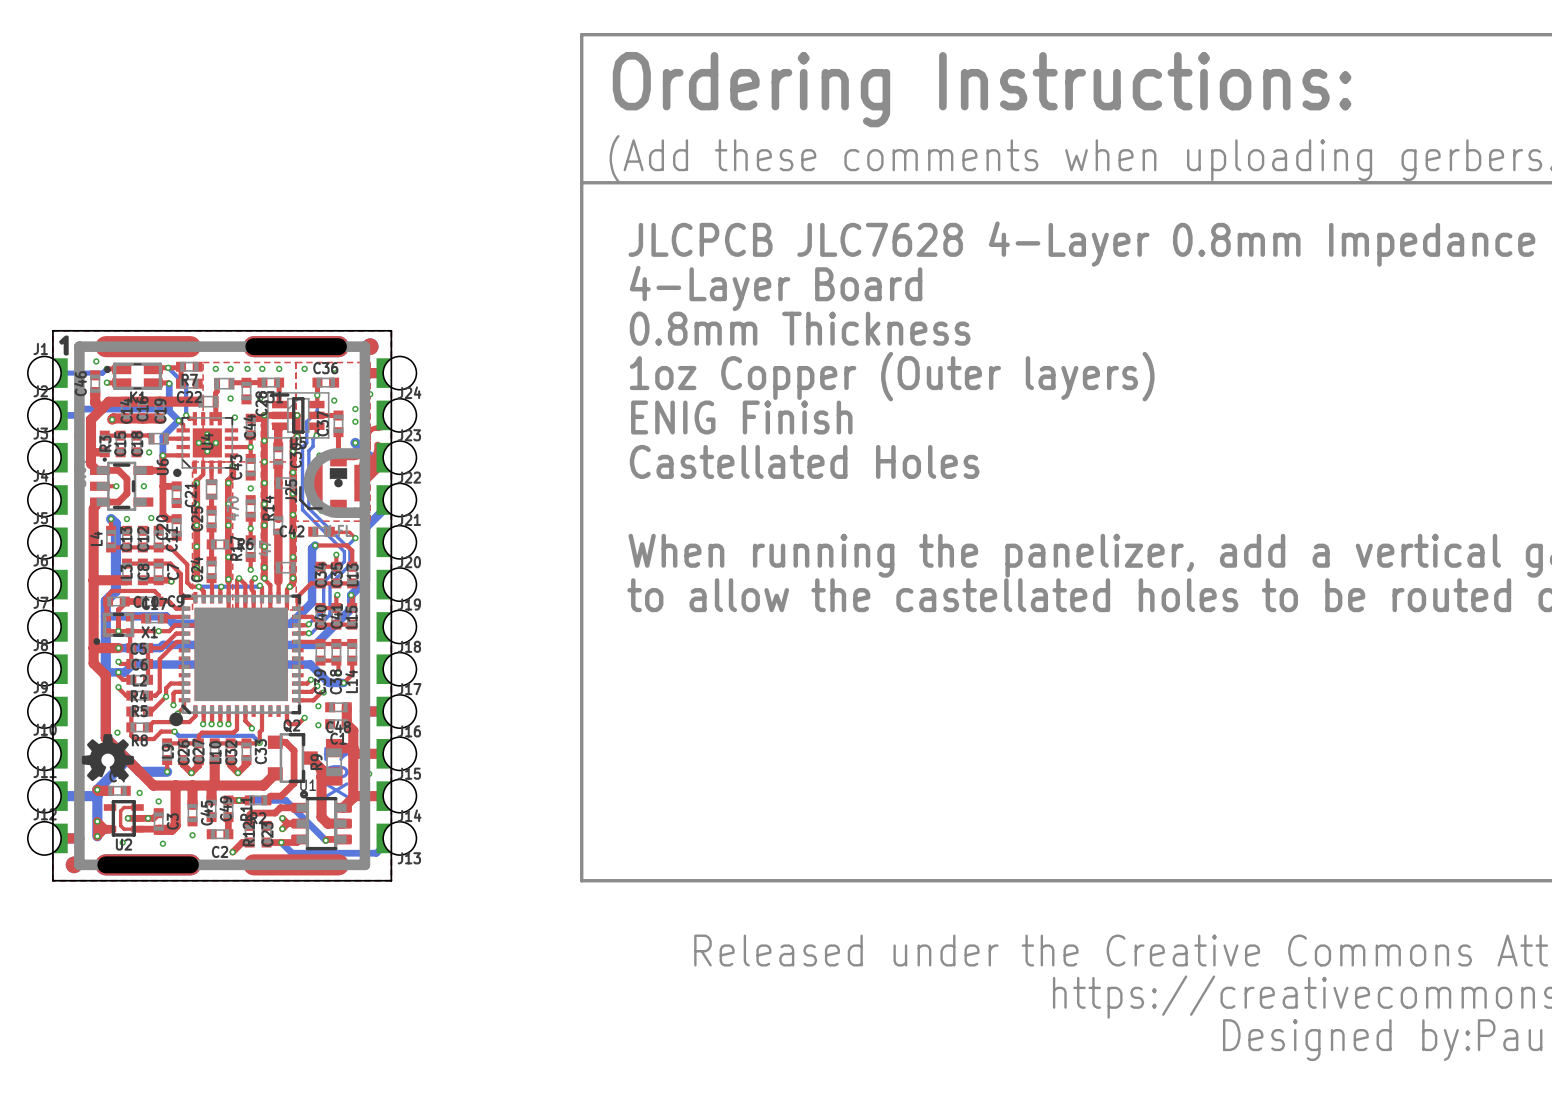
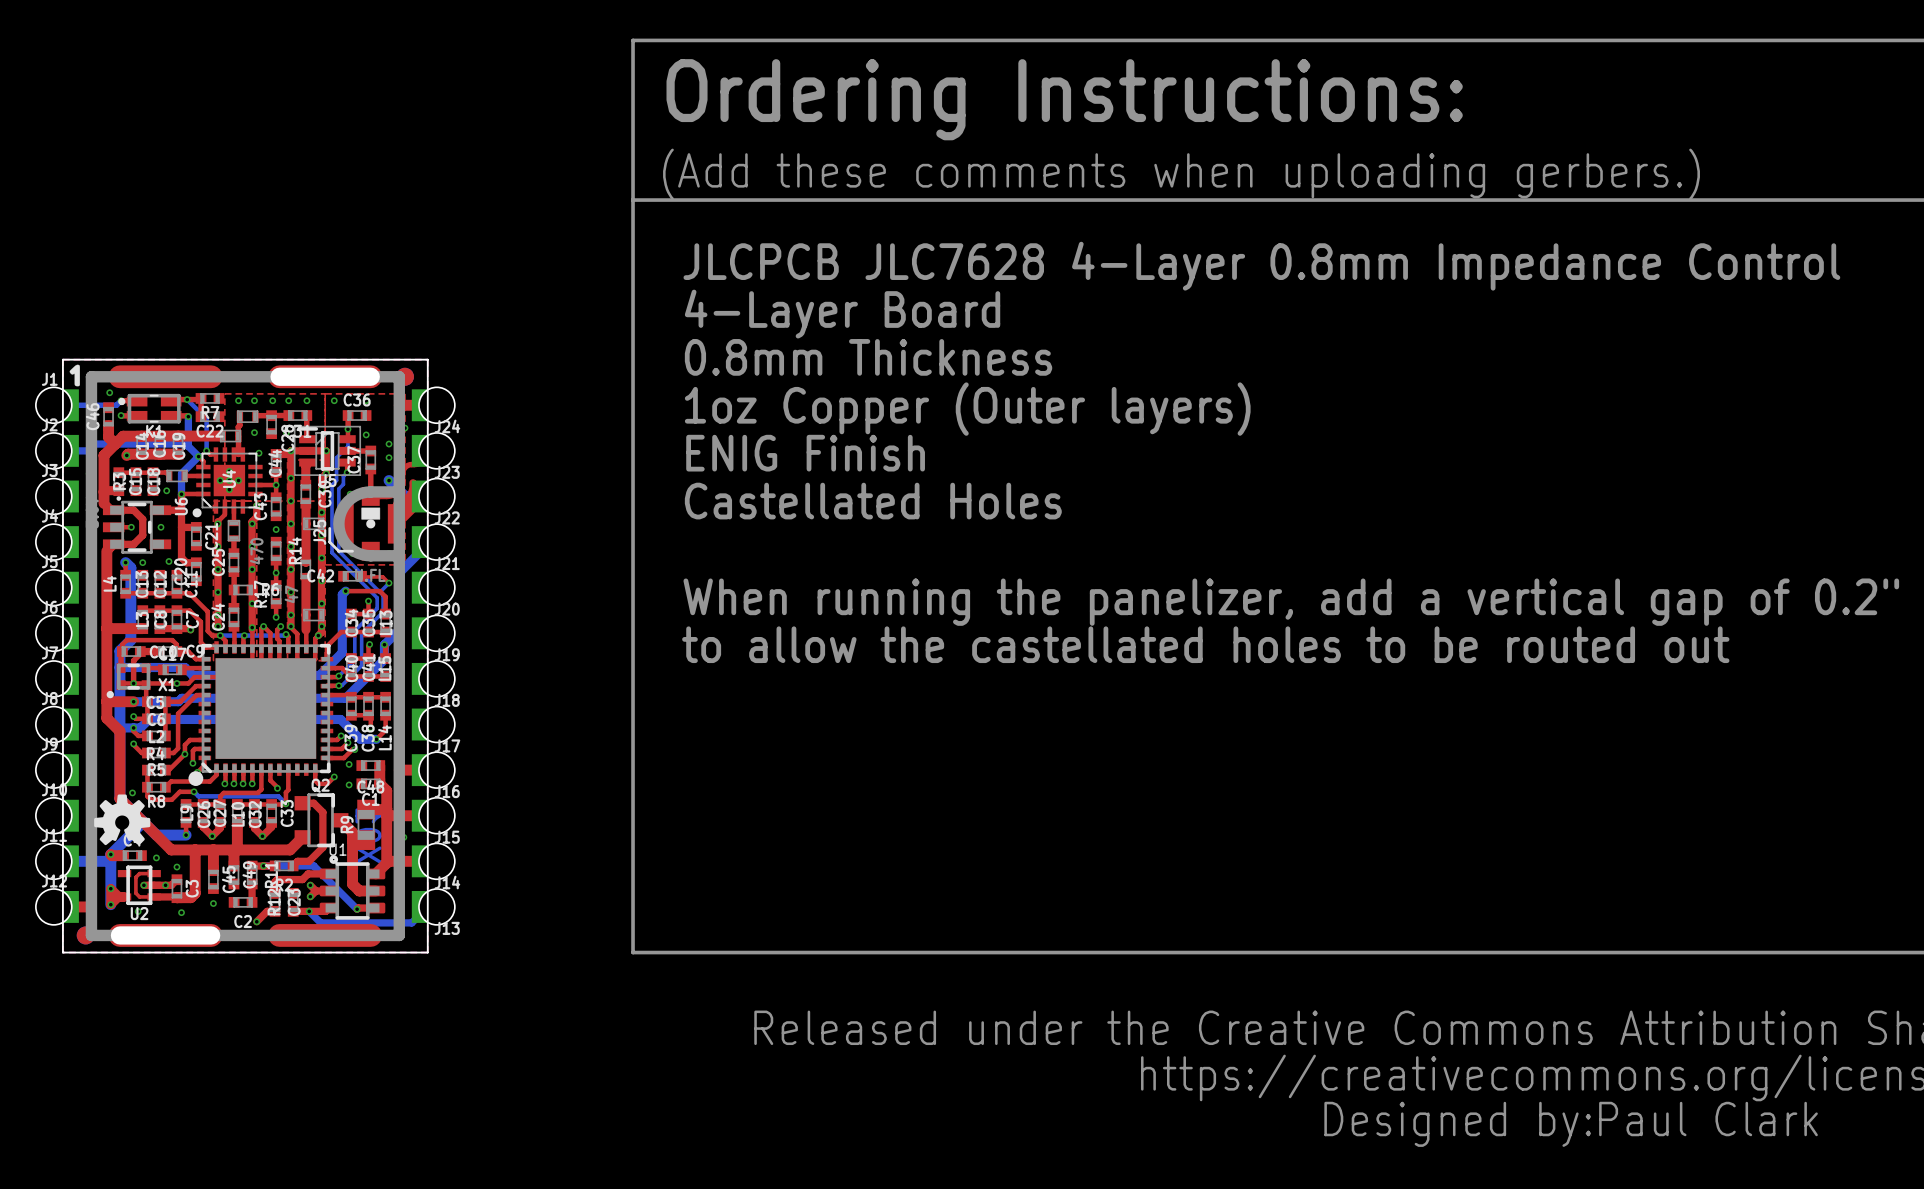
part footprint: [74, 336, 371, 876] -> [85, 365, 405, 947]

